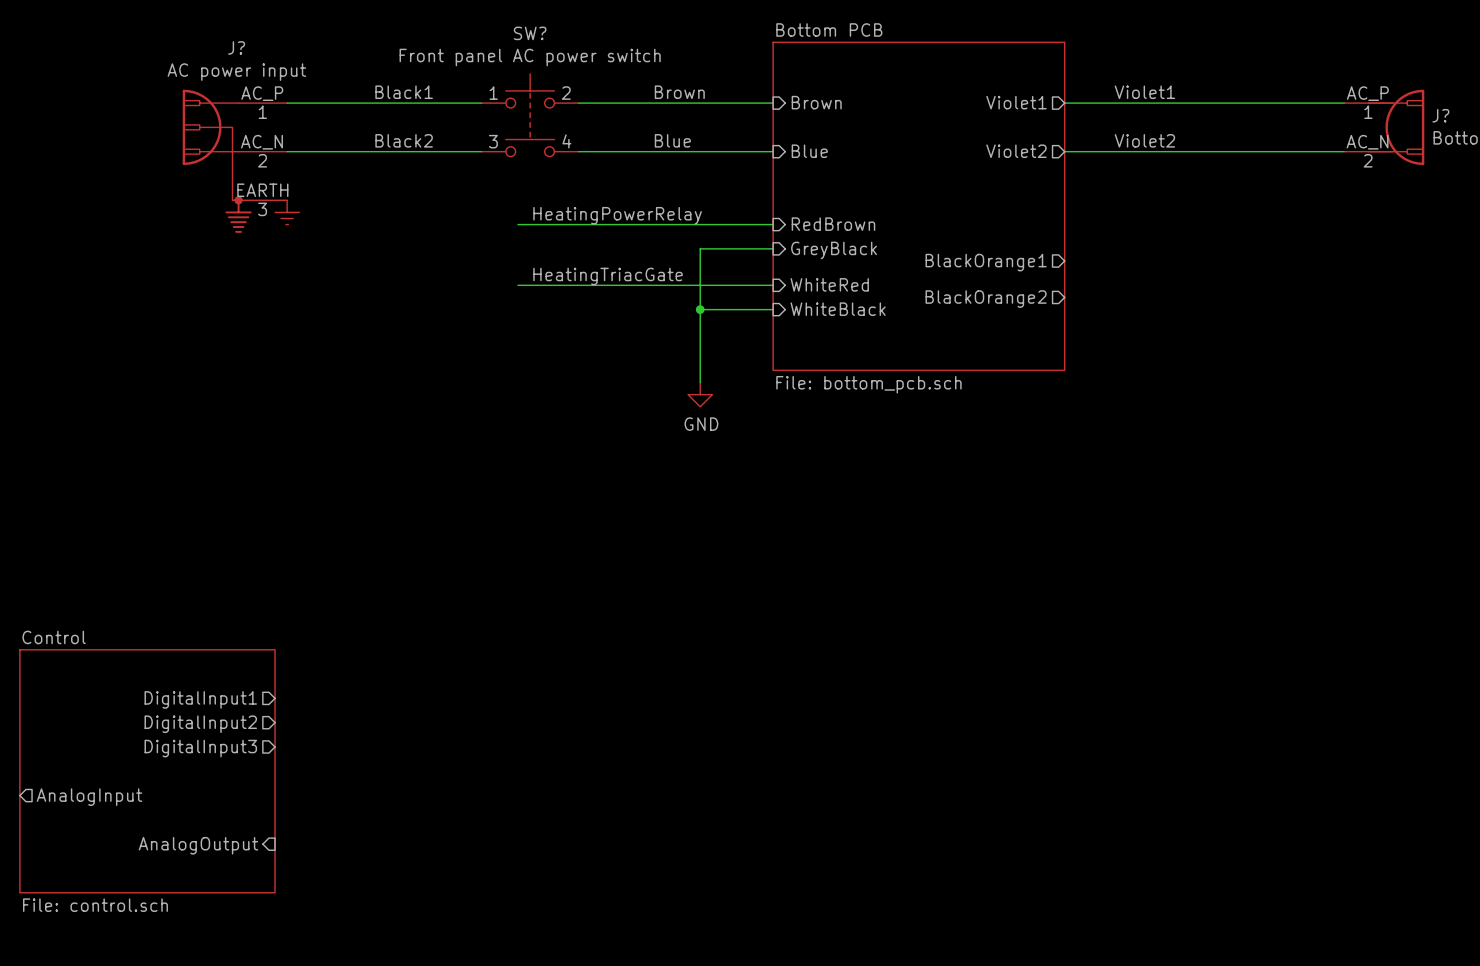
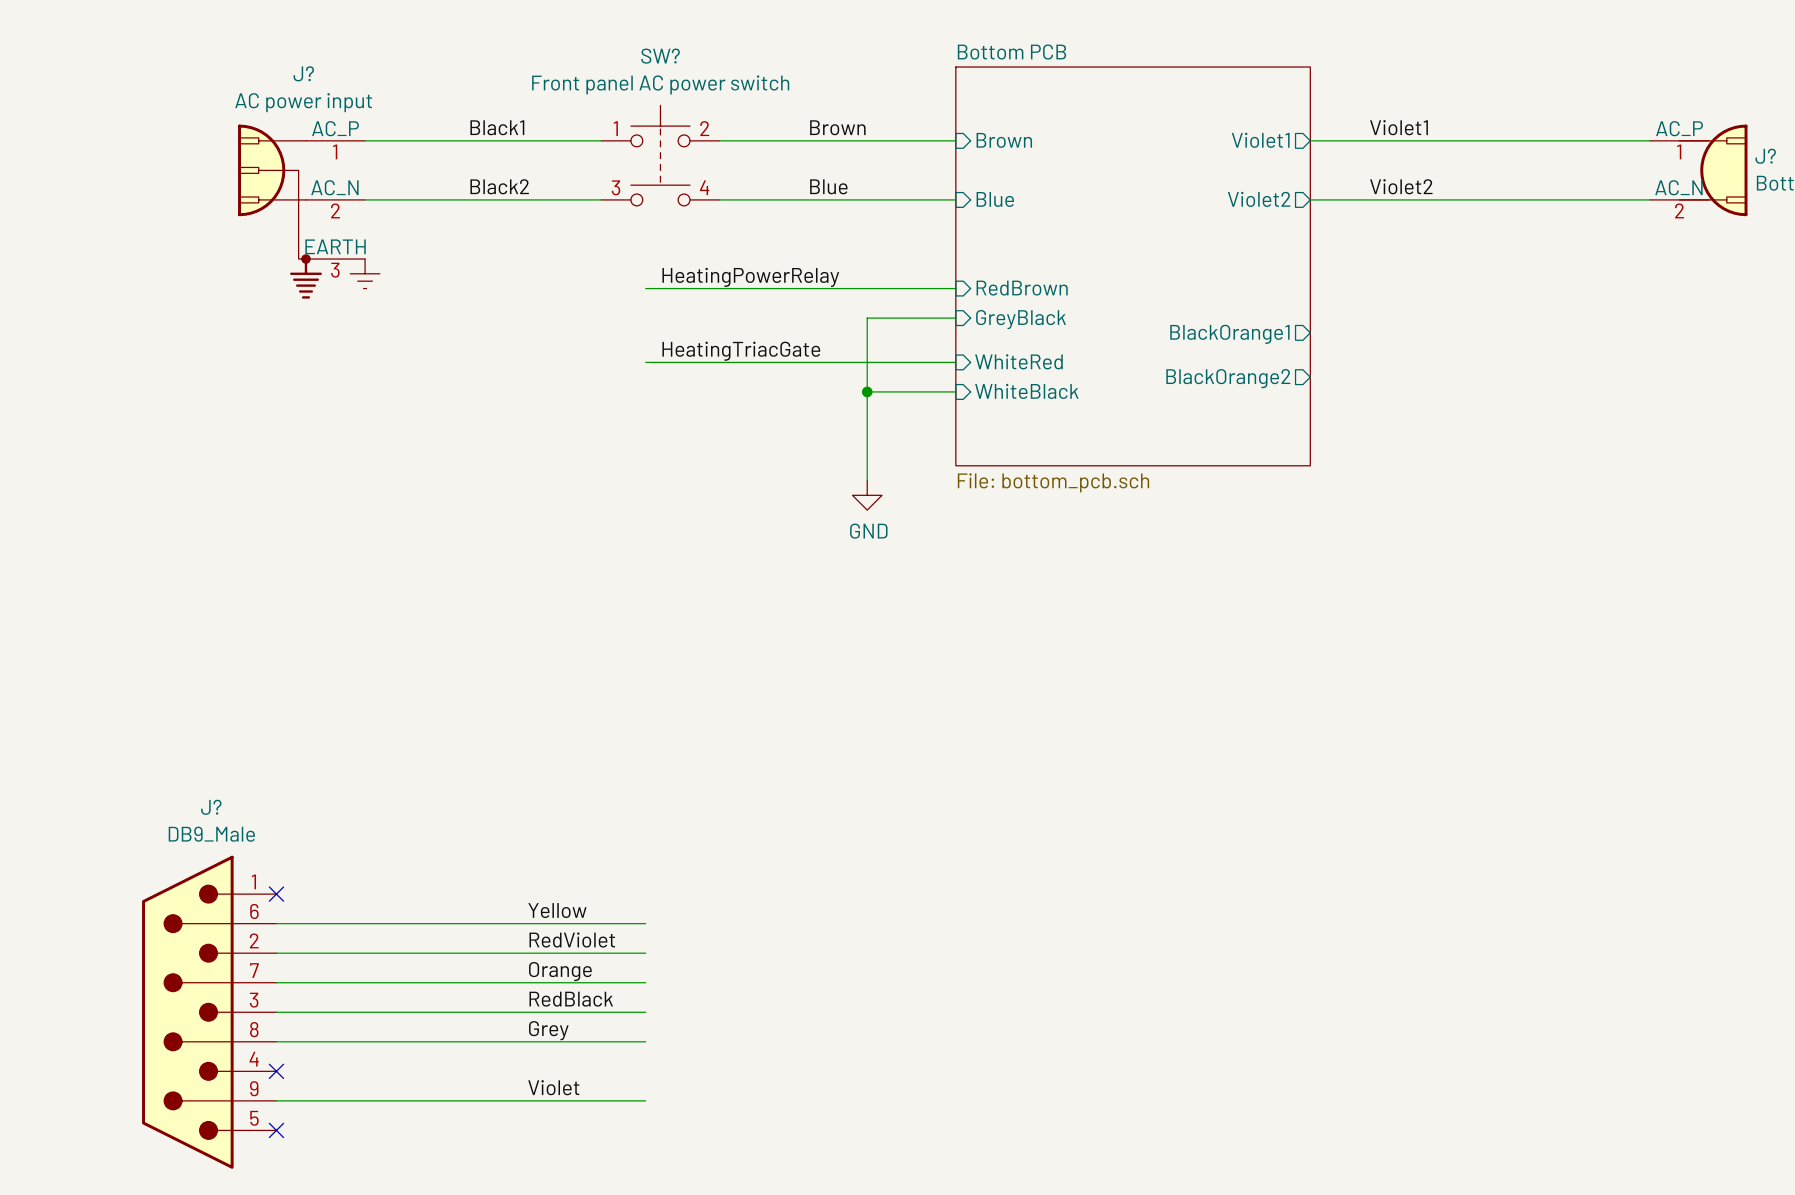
sheet pin: DigitalInput1 (200, 699) -> none
no-connect mark: none -> (276, 894)
sheet pin: DigitalInput2 (200, 724) -> none
label: none -> Yellow (557, 910)
wire: none -> (276, 923) (645, 923)
sheet pin: DigitalInput3 (200, 748) -> none
label: none -> RedViolet (572, 940)
sheet Control: File: control.sch (147, 771) -> none
wire: none -> (276, 953) (645, 953)
label: none -> Orange (560, 971)
wire: none -> (276, 982) (645, 982)
sheet pin: AnalogInput (89, 797) -> none
label: none -> RedBlack (571, 999)
J?: none -> DB9_Male (209, 1012)
wire: none -> (276, 1012) (645, 1012)
label: none -> Grey (548, 1030)
wire: none -> (276, 1041) (645, 1041)
sheet pin: AnalogOutput (198, 845) -> none
no-connect mark: none -> (276, 1071)
label: none -> Violet (553, 1087)
wire: none -> (276, 1100) (645, 1100)
no-connect mark: none -> (276, 1130)

